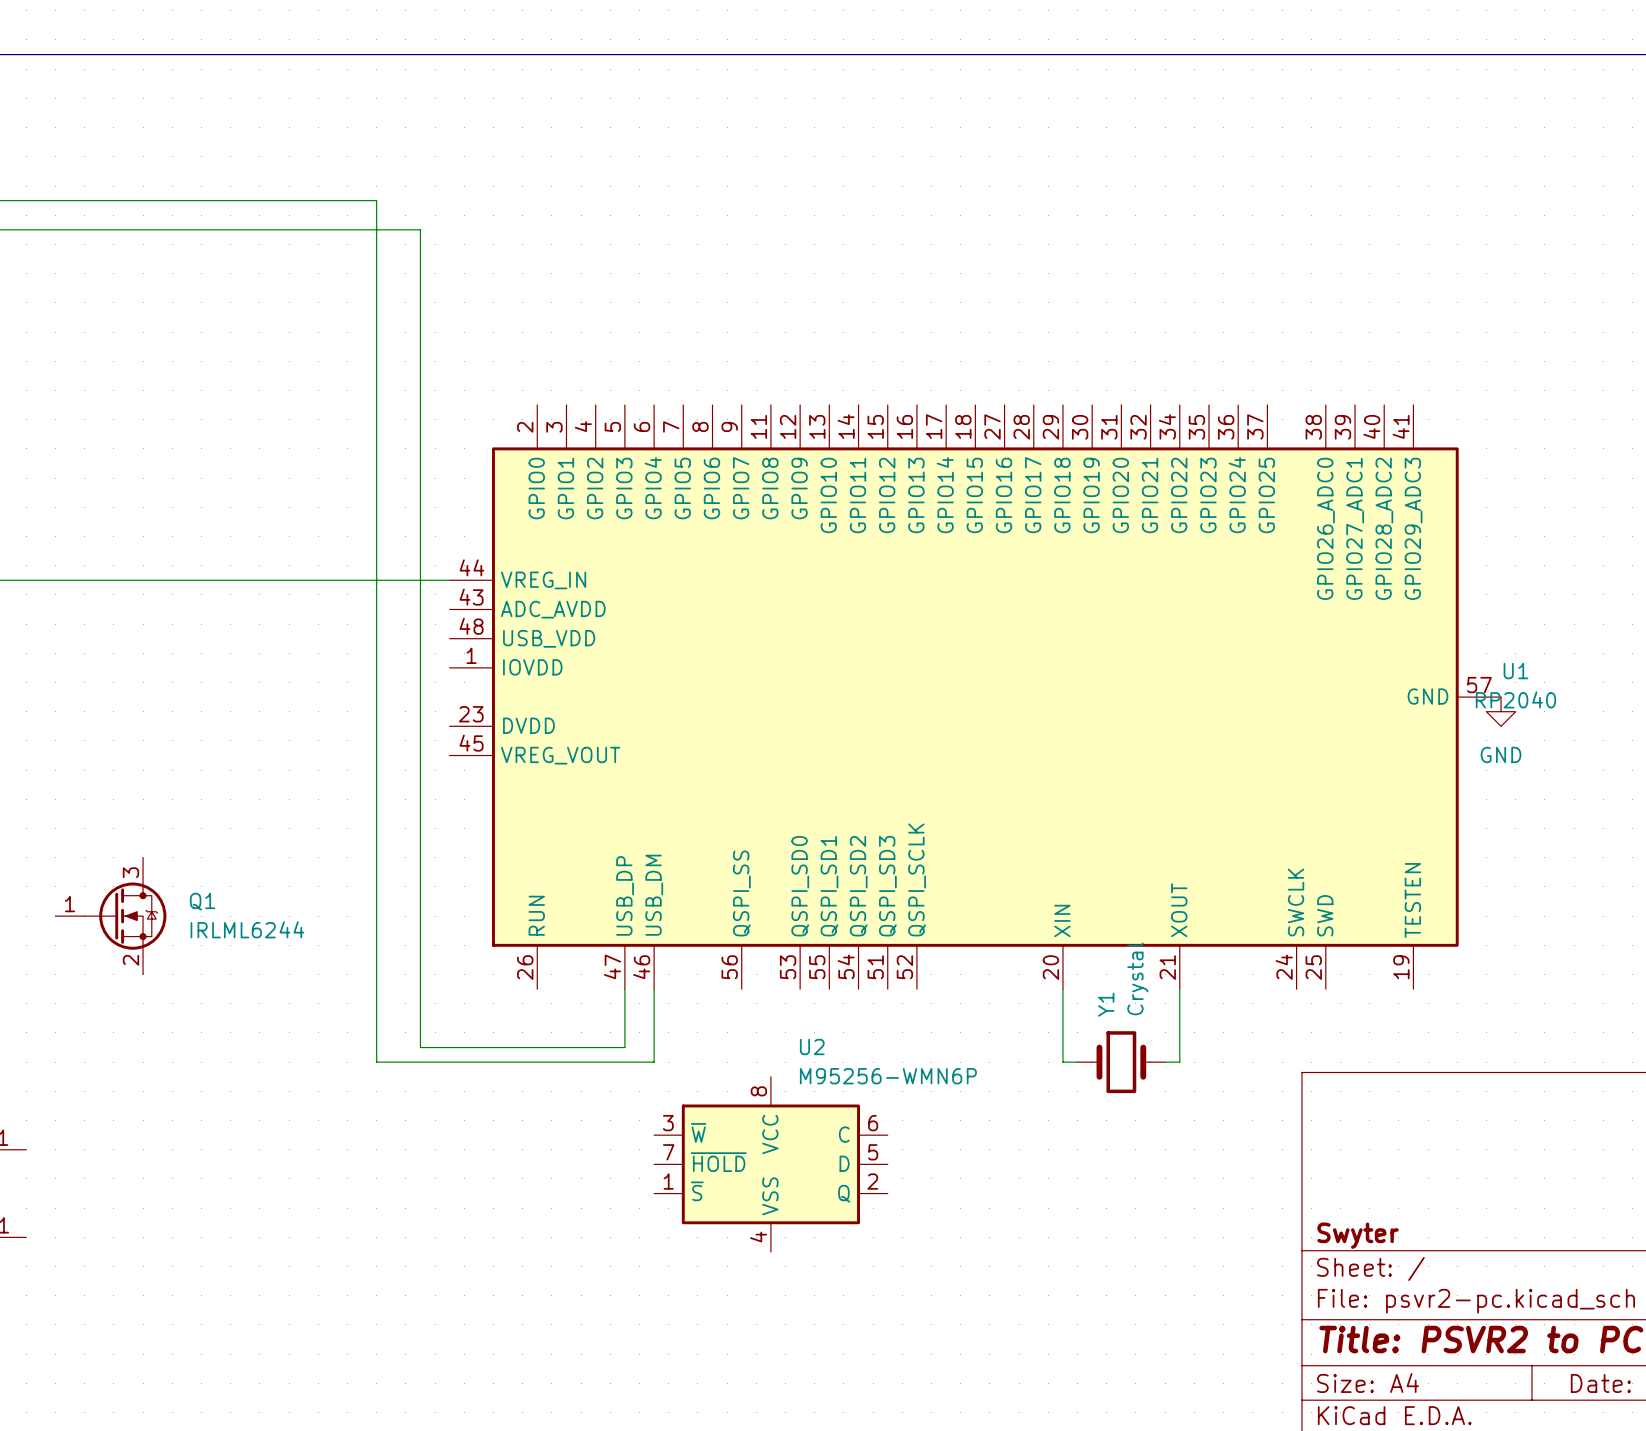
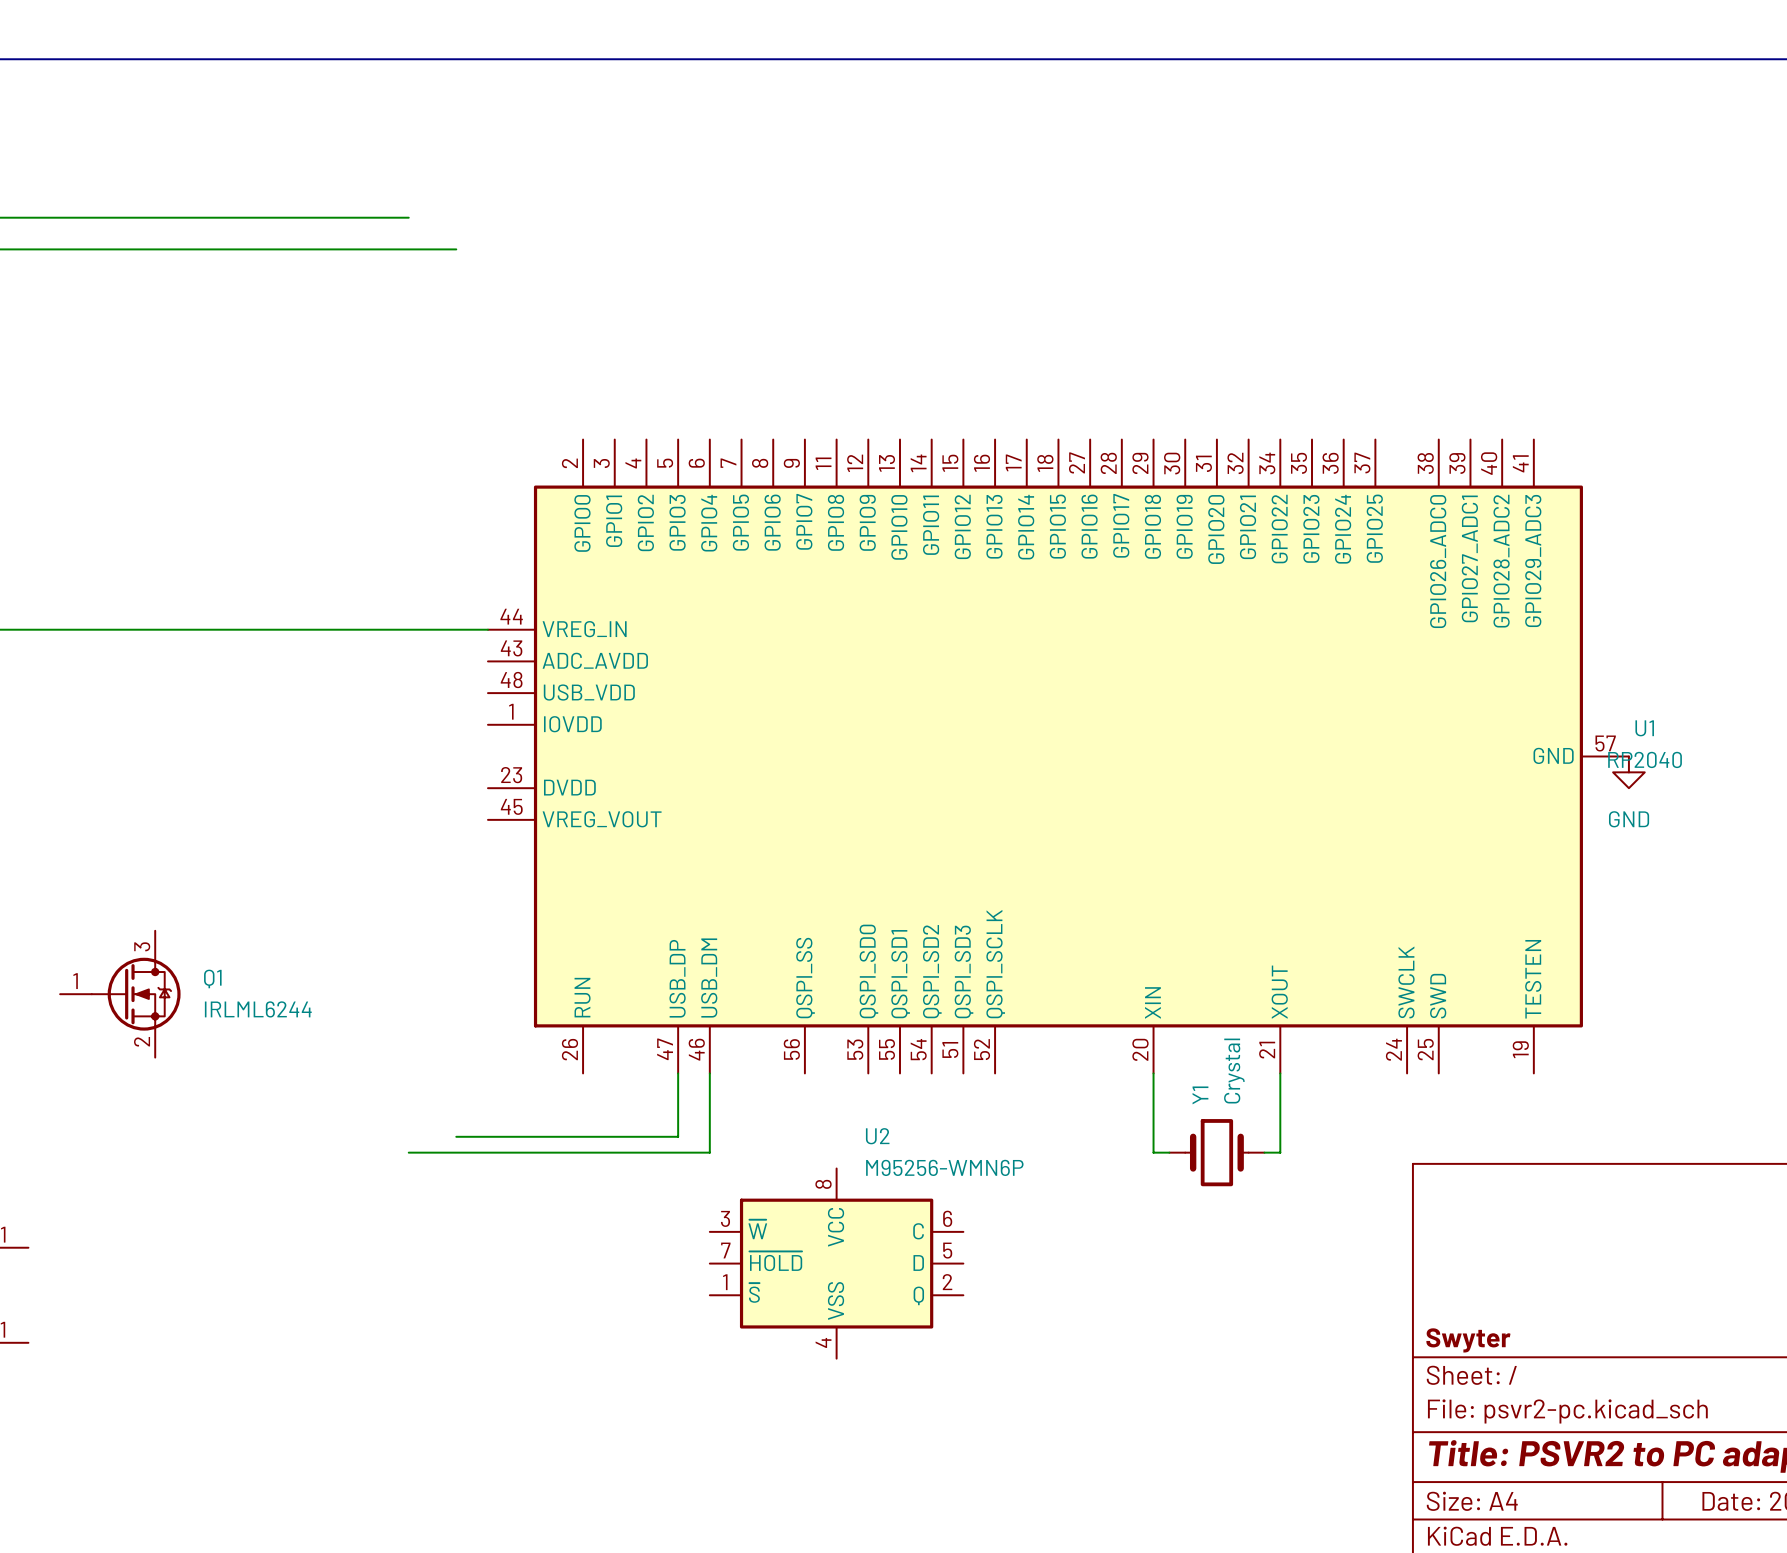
wire: (376, 200) (376, 1062) -> none
wire: (420, 229) (420, 1047) -> none

